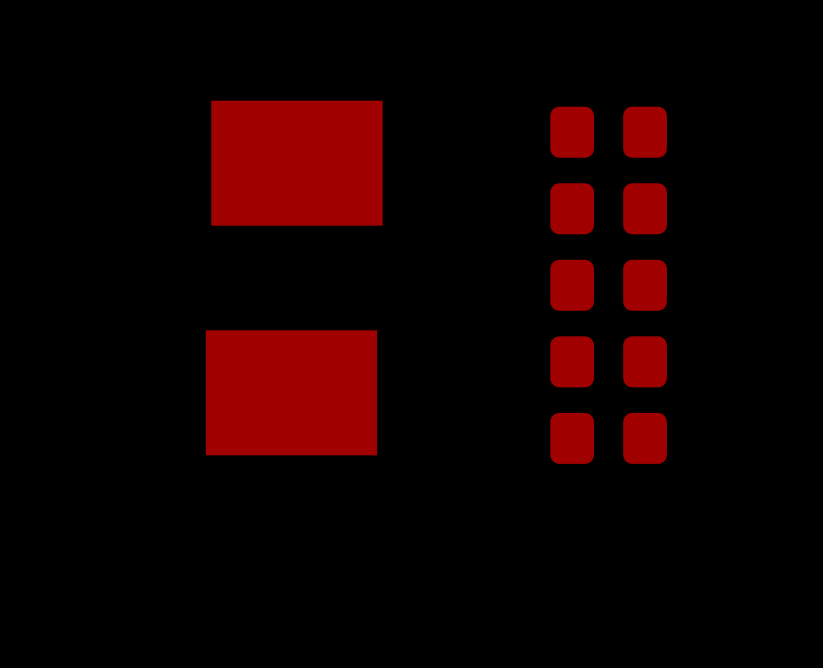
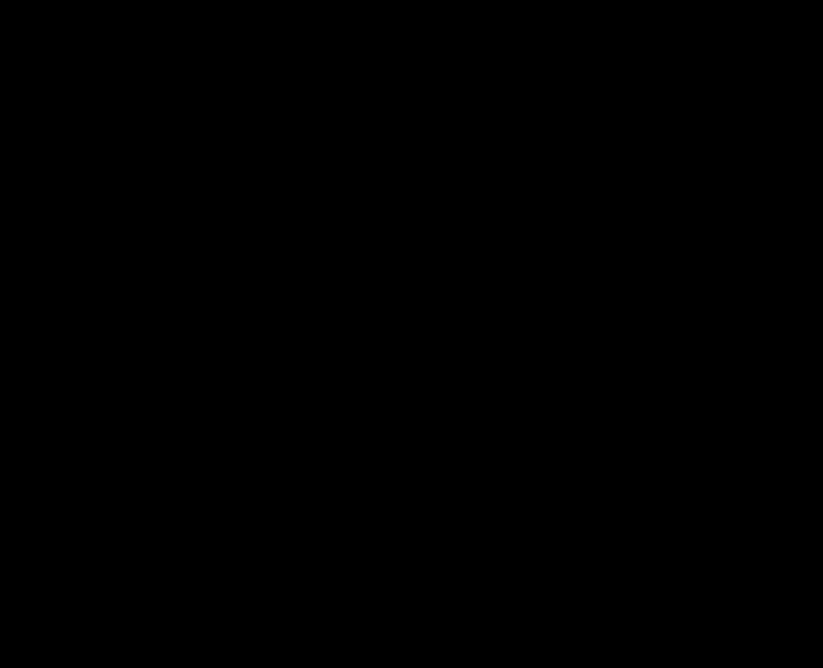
part: (608, 132) -> none
part: (296, 163) -> none
part: (608, 208) -> none
part: (608, 285) -> none
part: (608, 361) -> none
part: (291, 392) -> none
part: (608, 438) -> none

